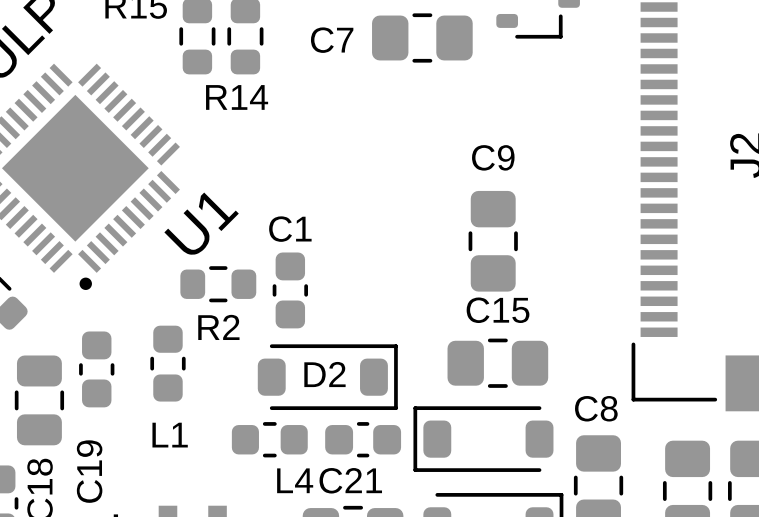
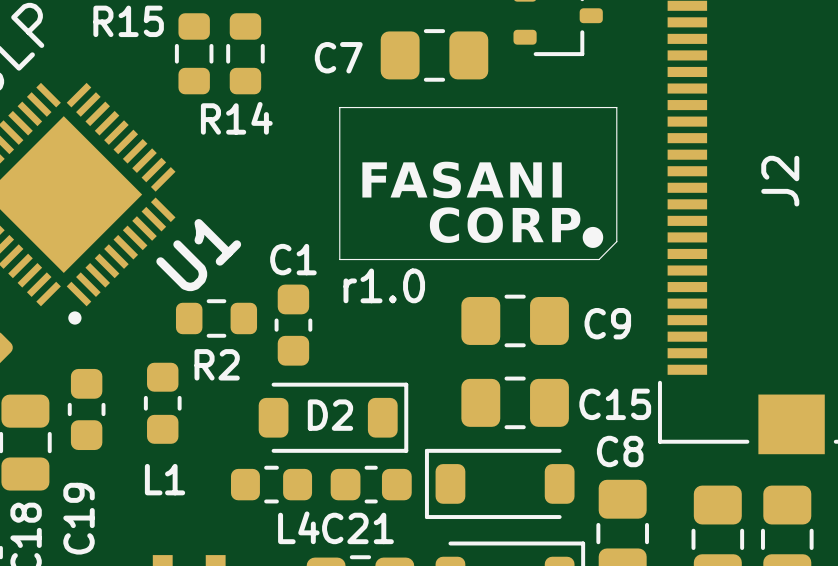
line: none -> (339, 107) (616, 107) (616, 241) (599, 259) (339, 259) (339, 107)
drawing: none -> [362, 161, 604, 248]
C9 rotation: 0° (493, 241) -> 90° clockwise (515, 320)
text: none -> r1.0 (384, 285)
C15 name position: C15 (498, 310) -> C15 (615, 404)

